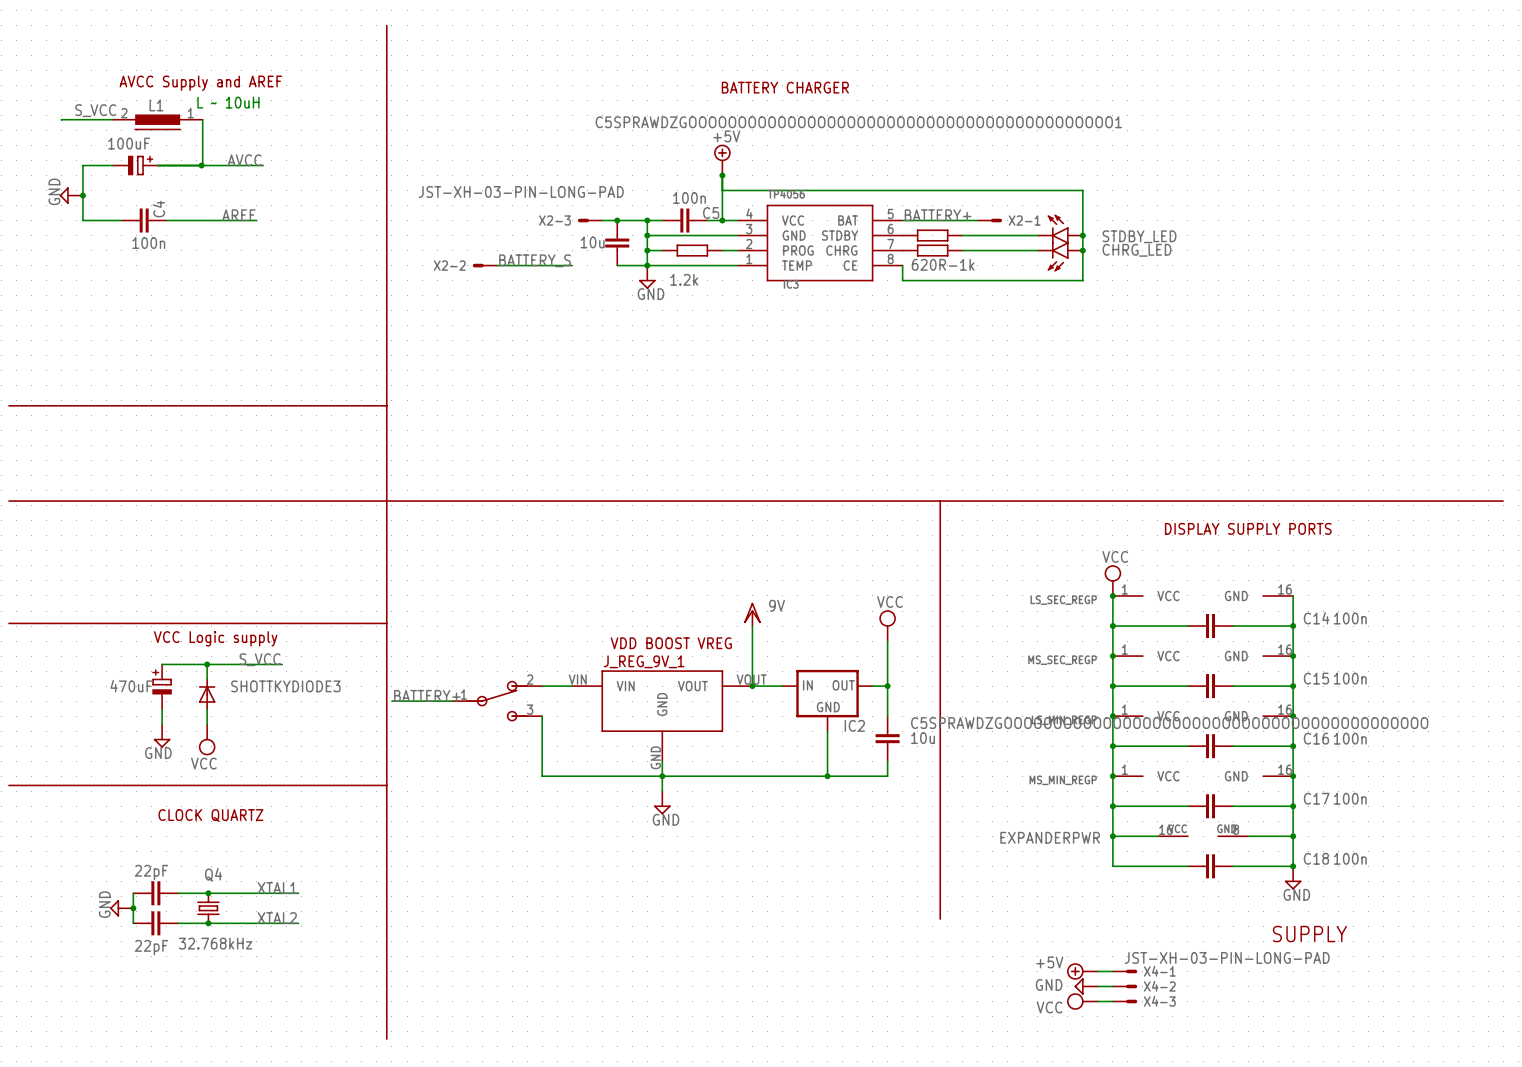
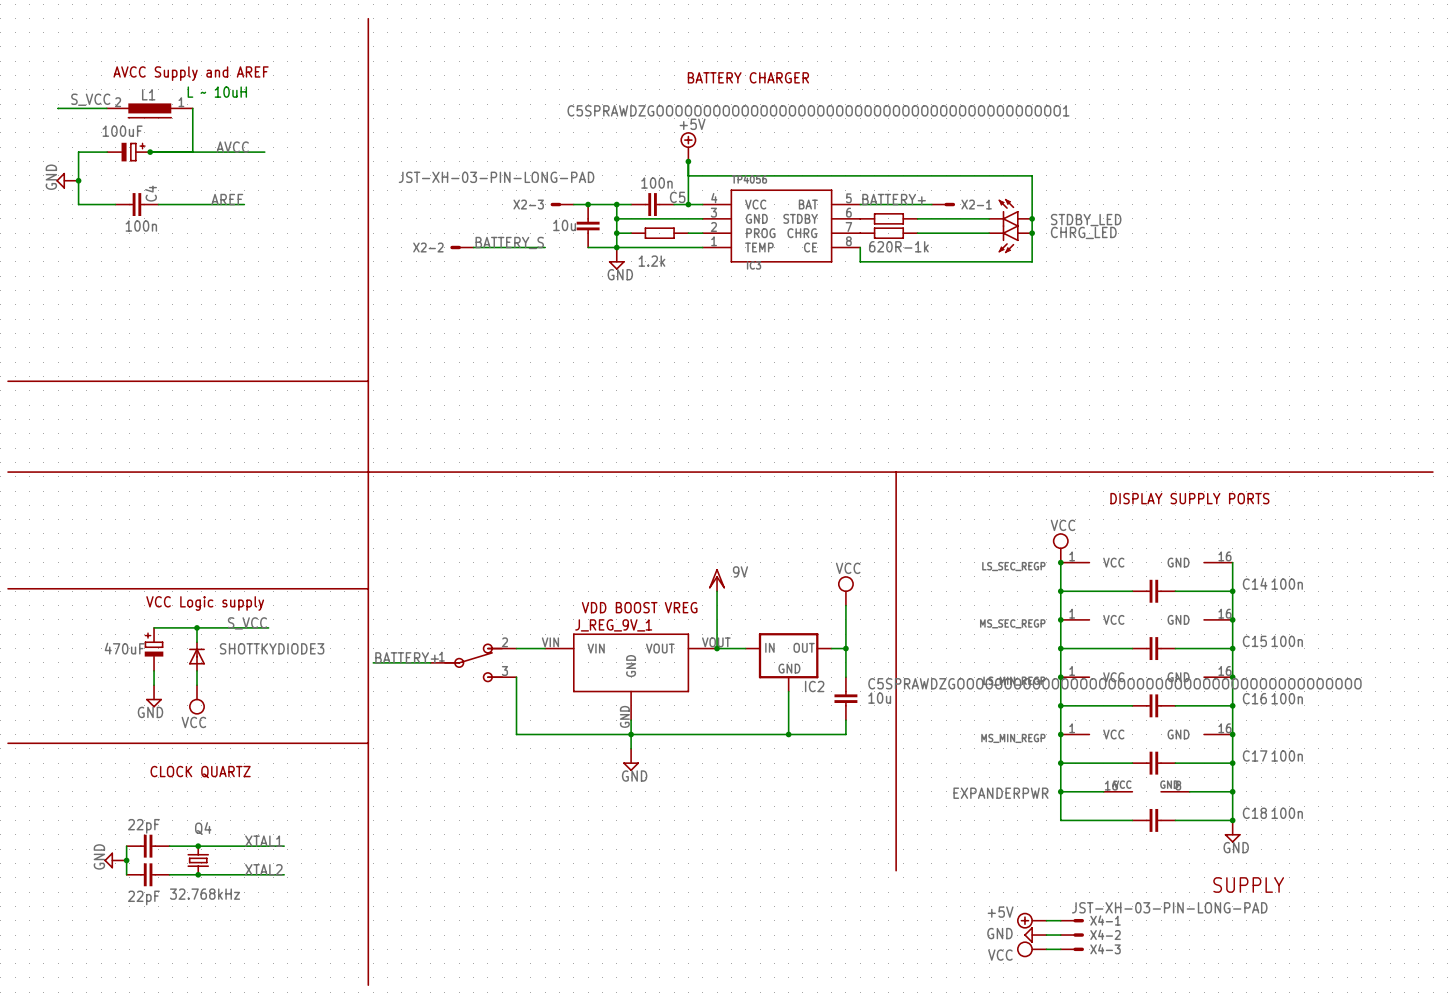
junction: none -> (150, 152)
junction: (201, 165) -> none
wire: none -> (250, 152) (264, 152)

